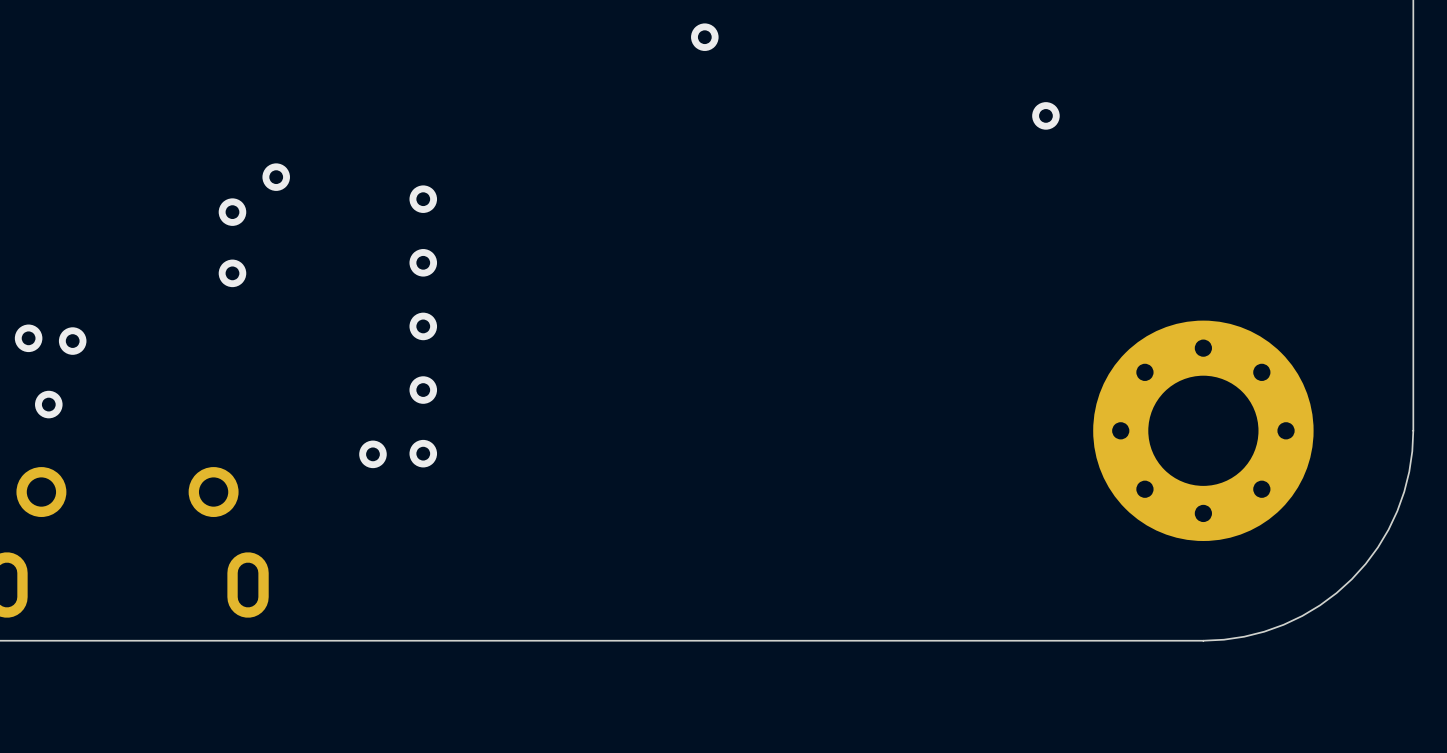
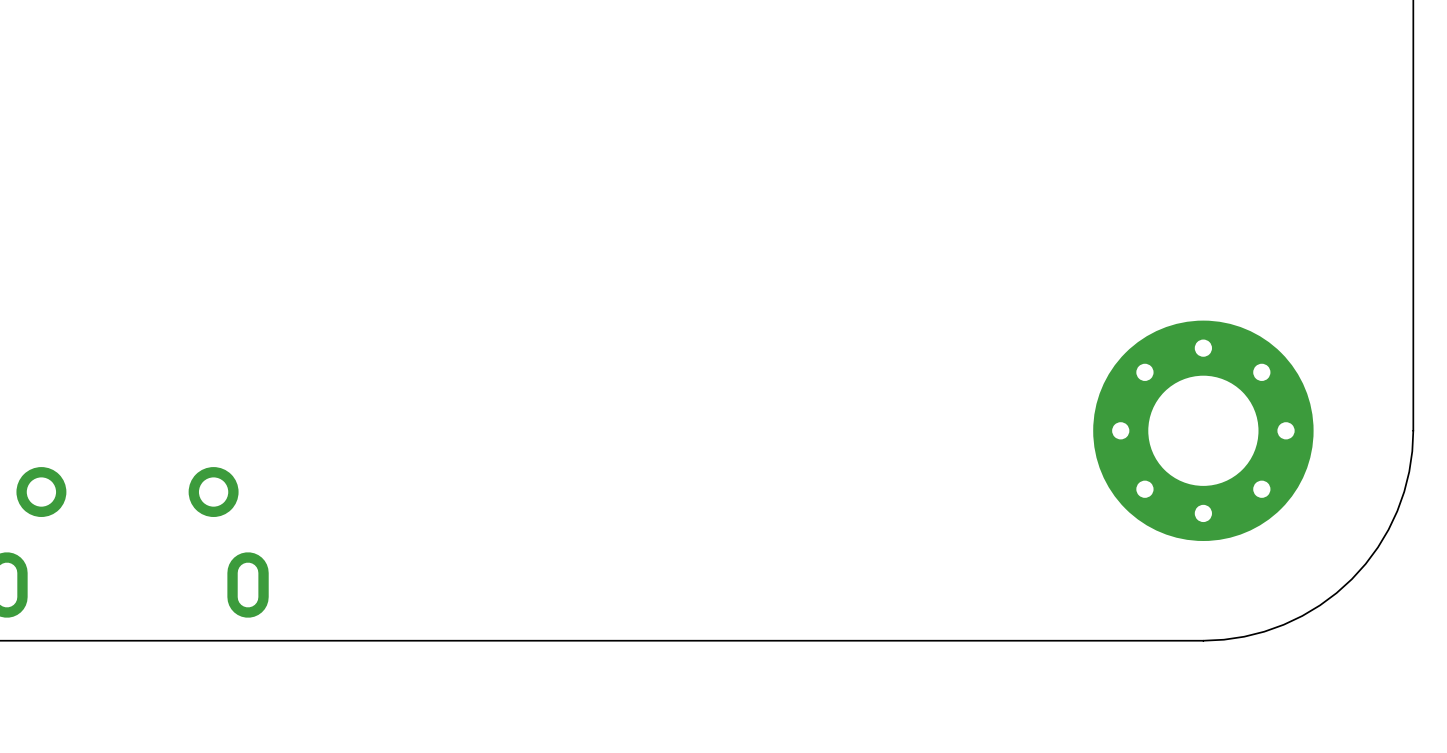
via: (704, 37) -> none
via: (1045, 115) -> none
via: (276, 177) -> none
via: (423, 199) -> none
via: (232, 212) -> none
via: (423, 262) -> none
via: (232, 273) -> none
via: (423, 326) -> none
via: (28, 338) -> none
via: (72, 341) -> none
via: (423, 390) -> none
via: (48, 404) -> none
via: (423, 453) -> none
via: (372, 454) -> none

